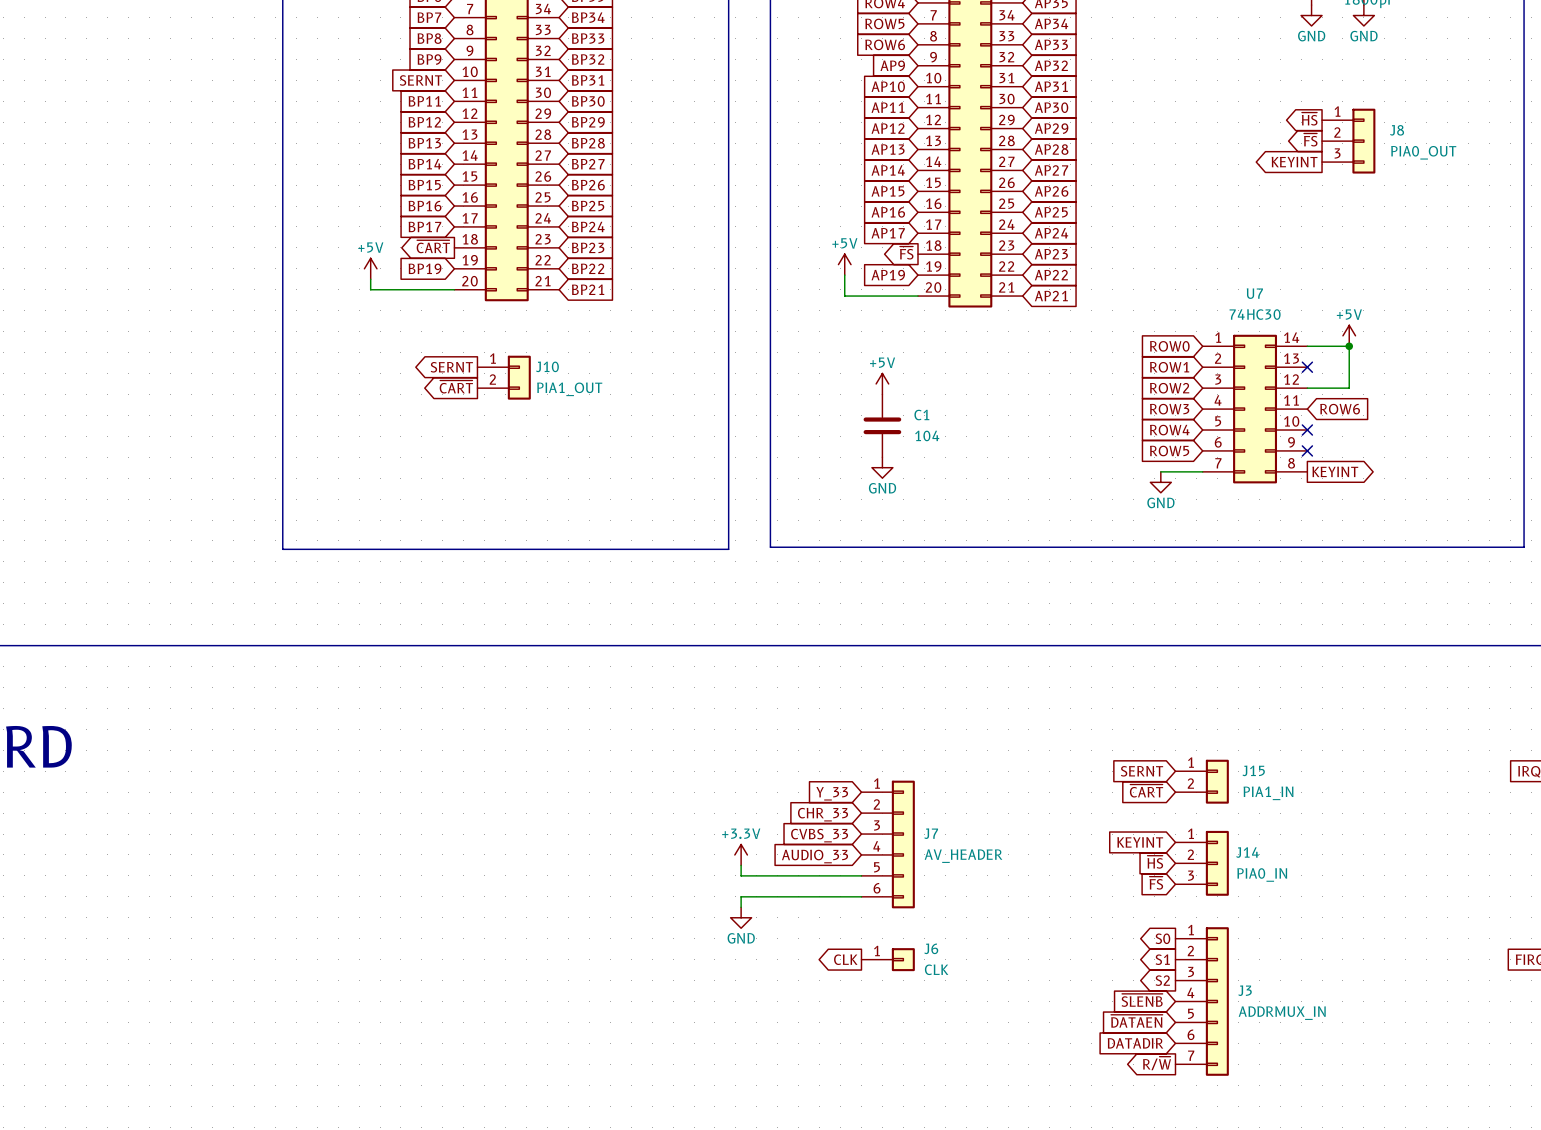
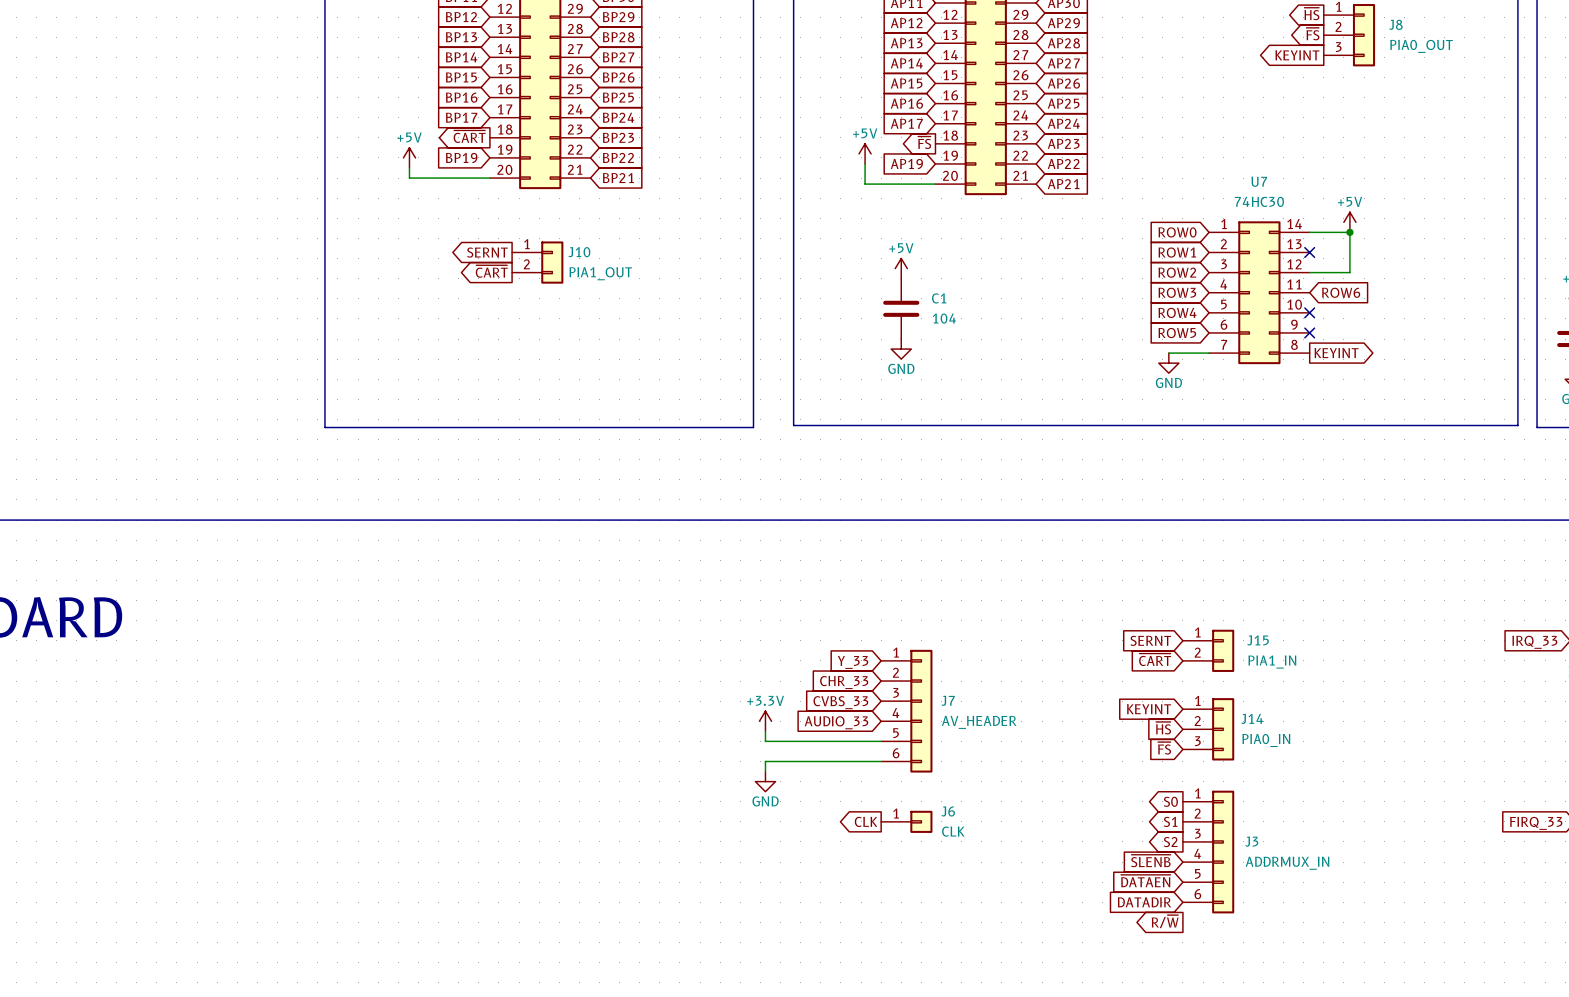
J3 symbol: [1175, 927, 1229, 1076] -> [1182, 790, 1235, 914]

